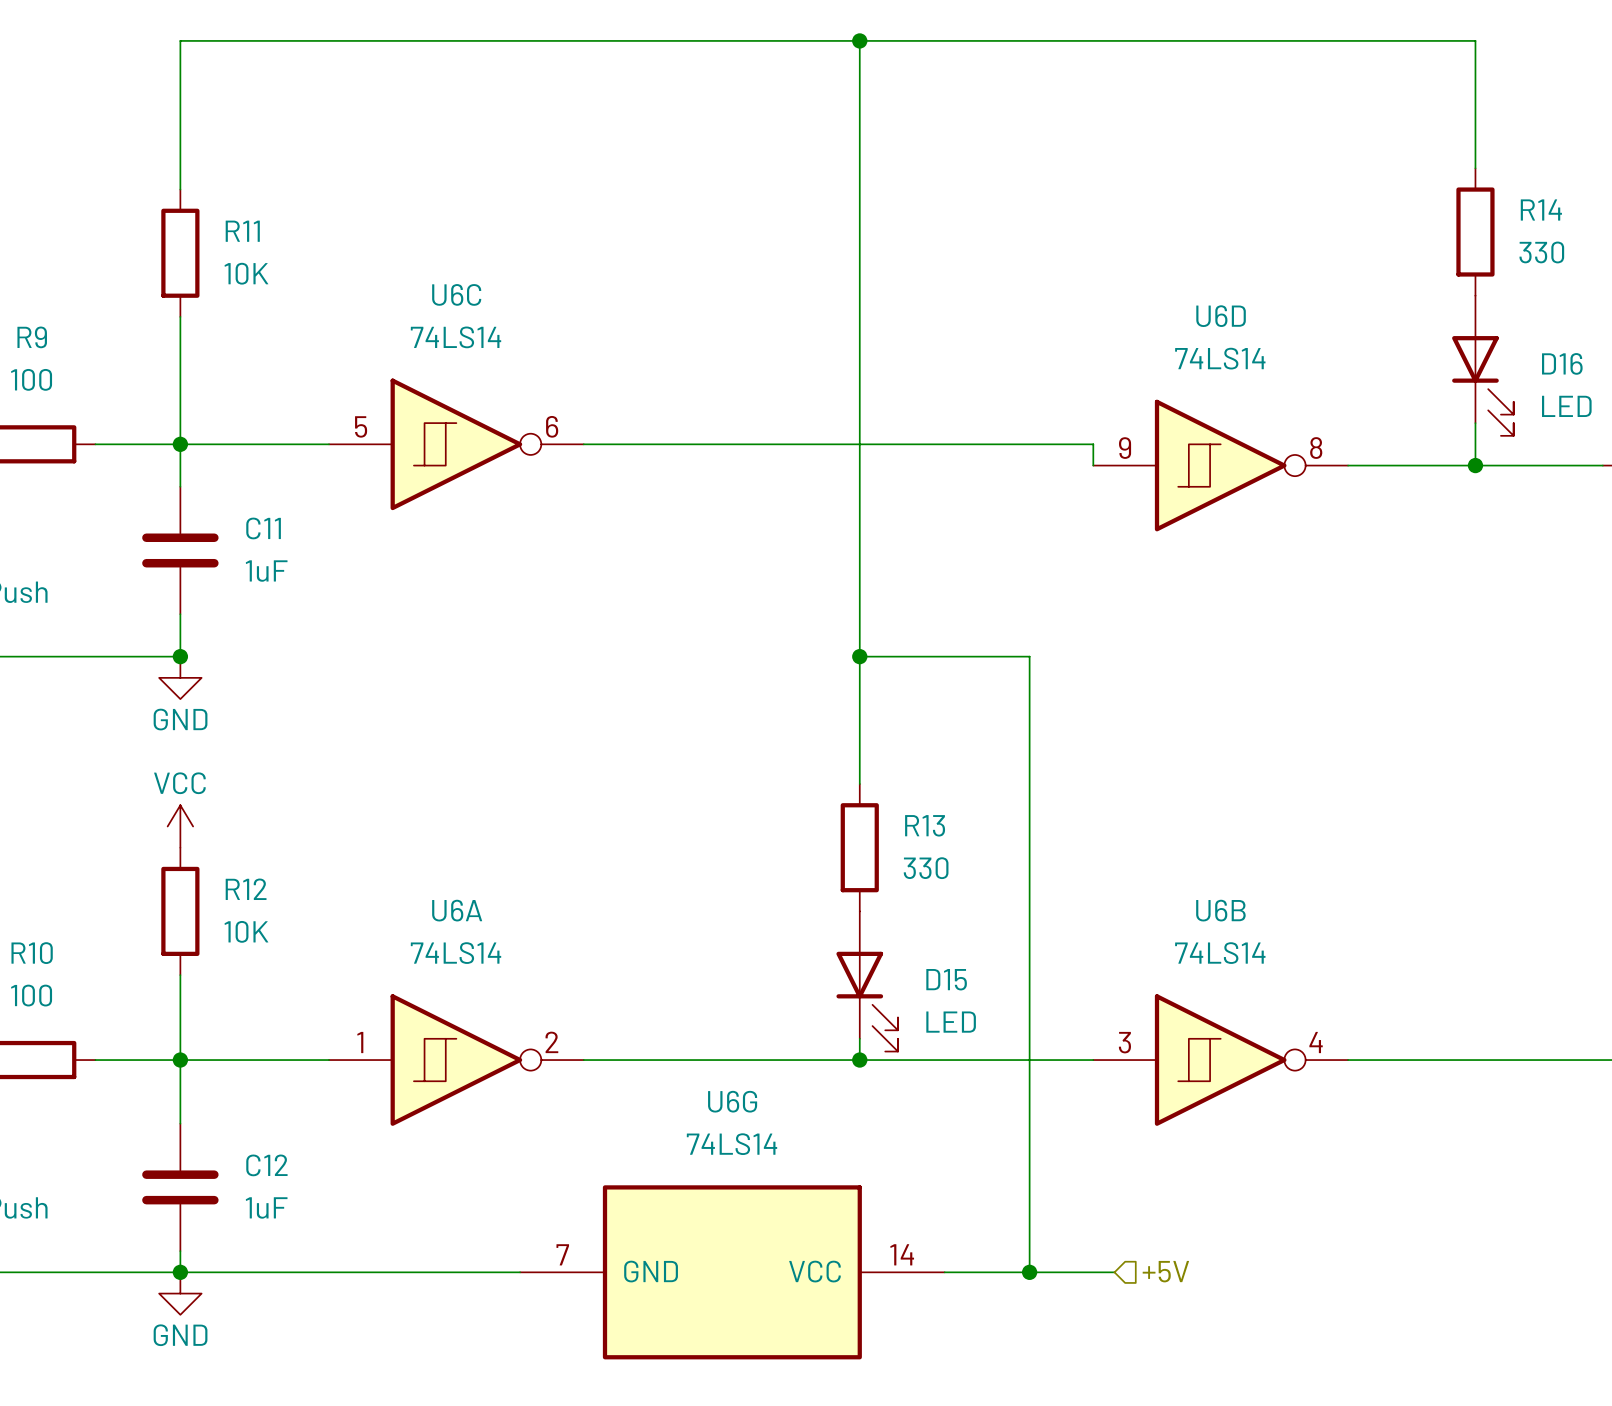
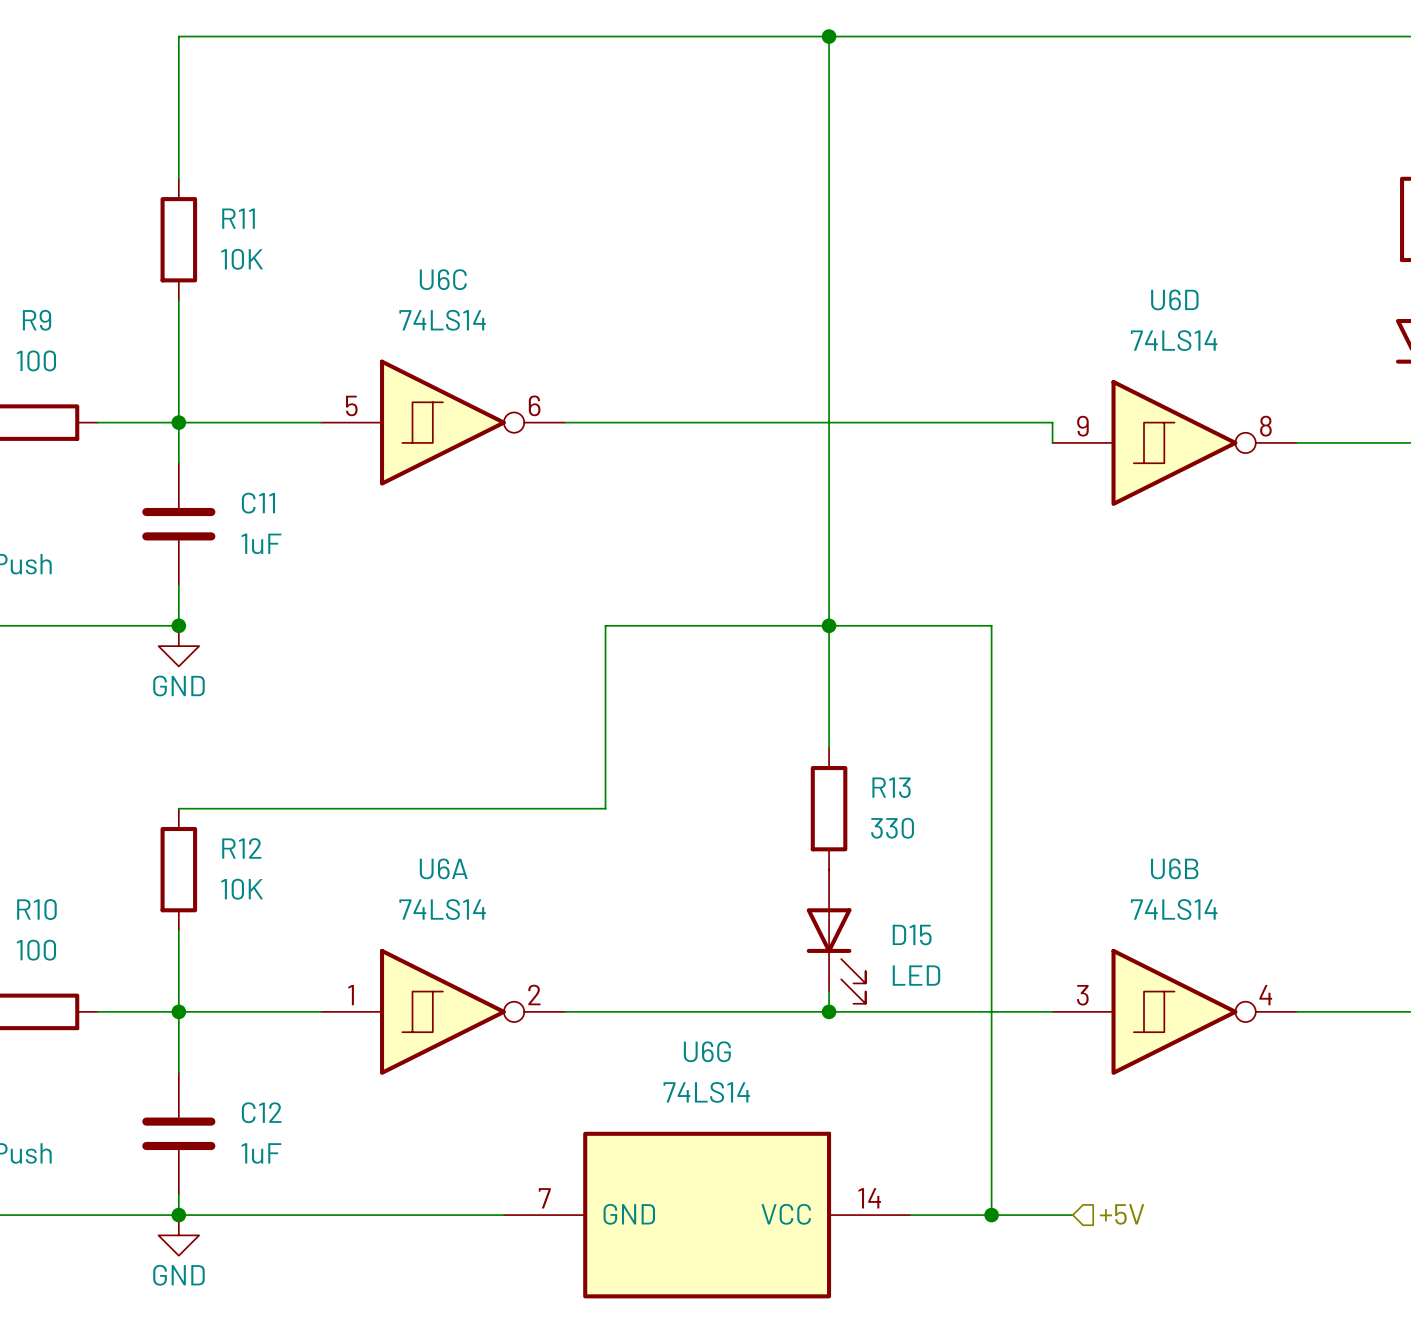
wire: none -> (829, 625) (605, 625) (605, 808) (178, 808)
power symbol: VCC (180, 826) -> none

